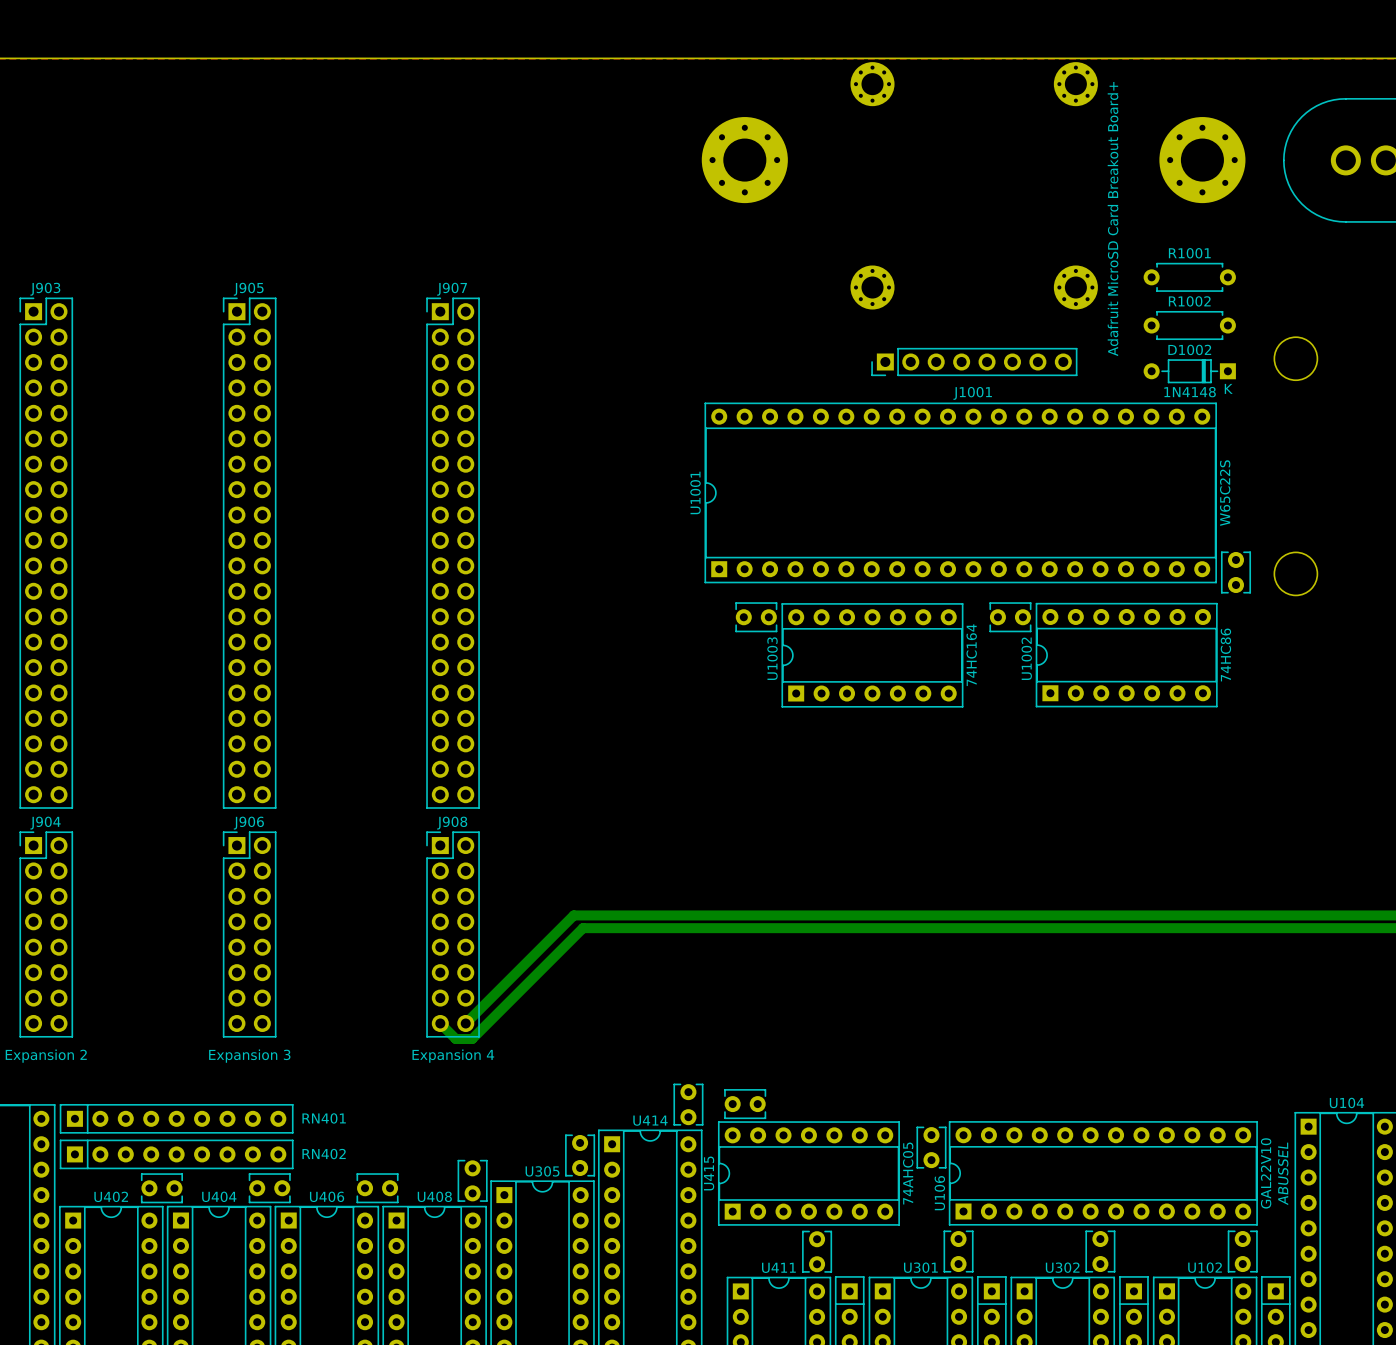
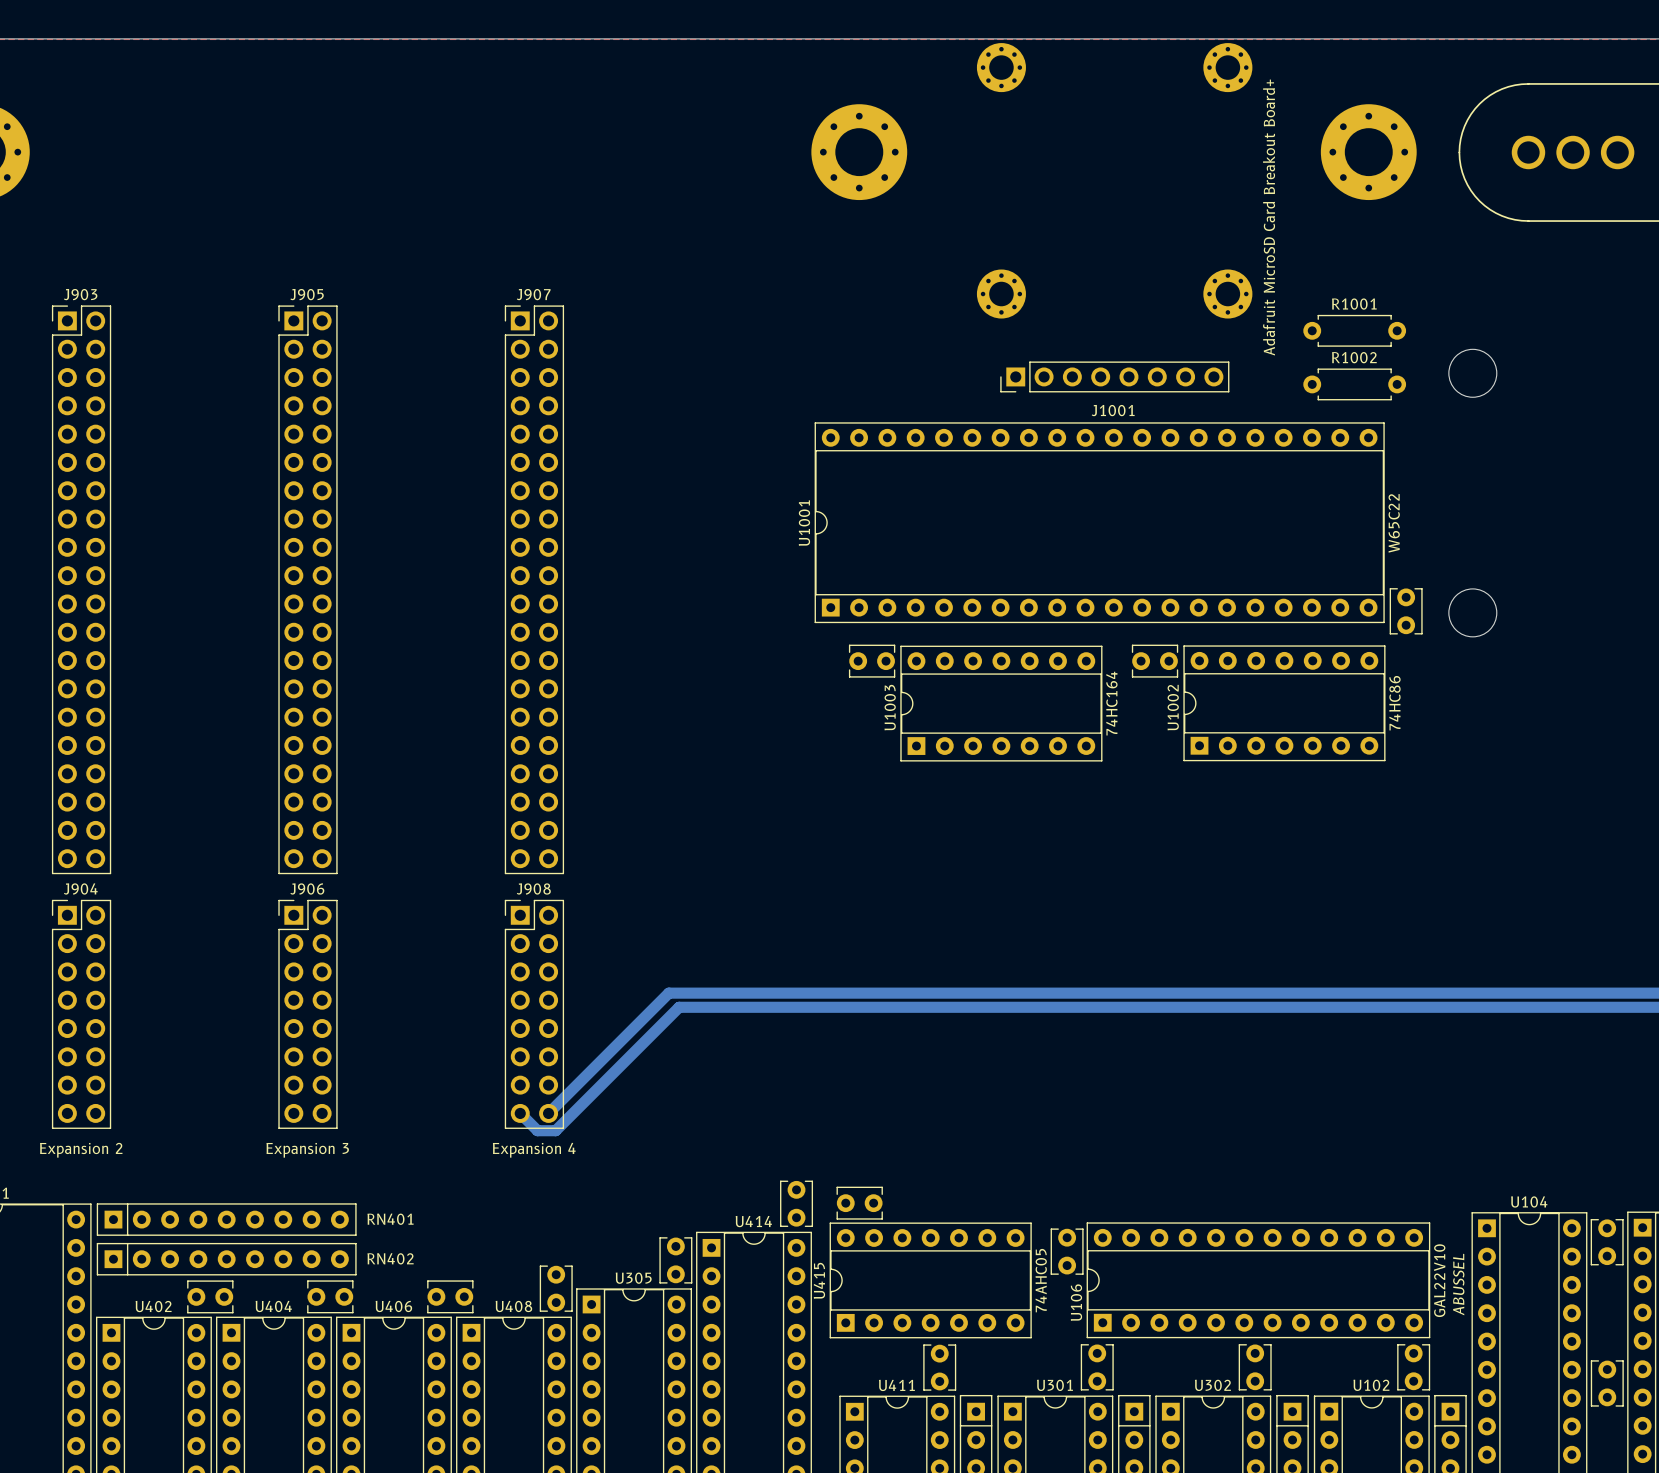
R1001 position: (1189, 277) -> (1354, 330)
R1002 position: (1189, 325) -> (1354, 384)
D1002: 1N4148 (1189, 371) -> none
U1001 value: W65C22S (1225, 493) -> W65C22 (1394, 523)

